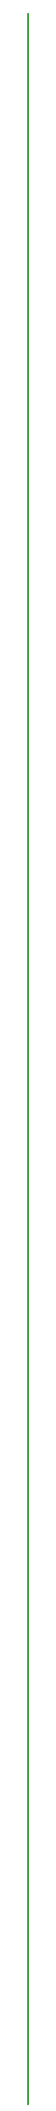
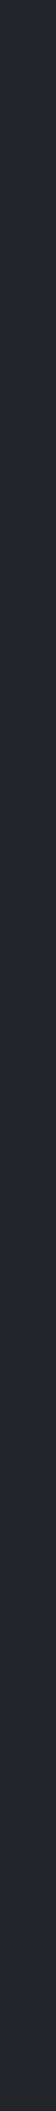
wire: (28, 13) (28, 2104) -> none

